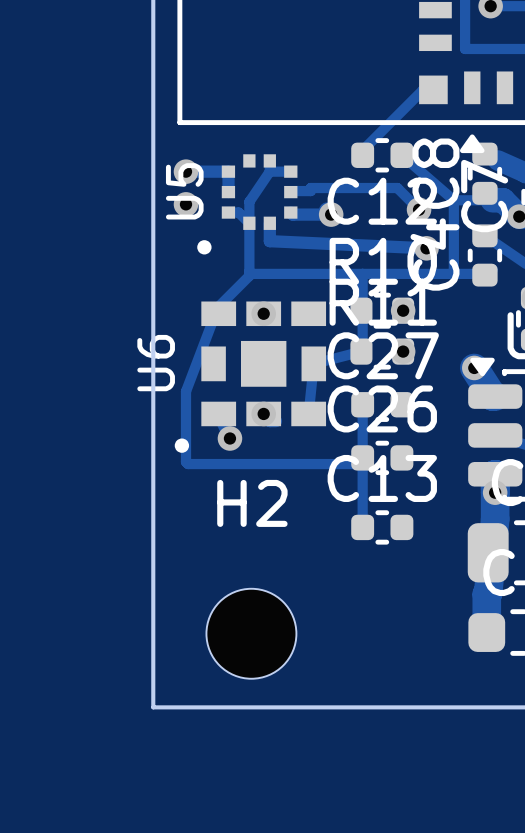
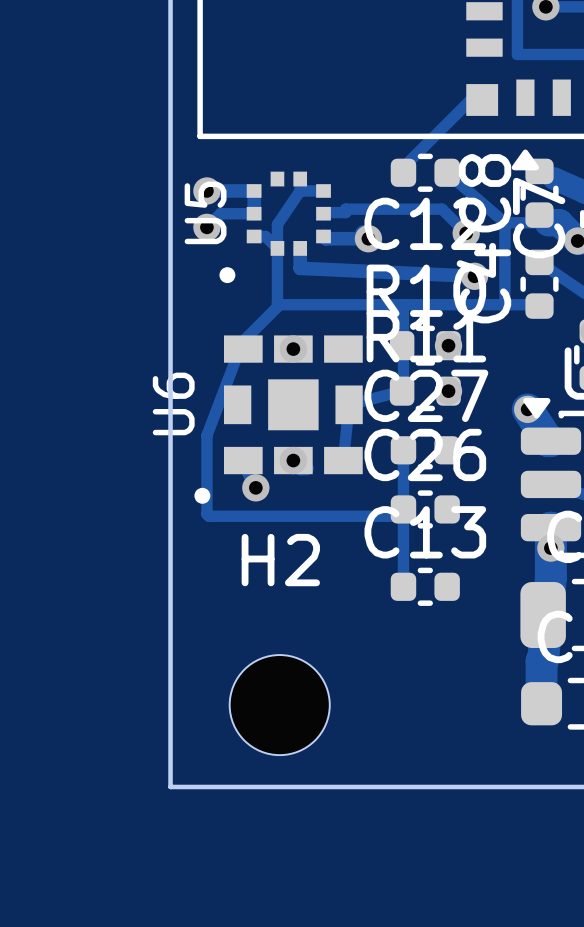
track: none -> (254, 213) (220, 213) (206, 227)

